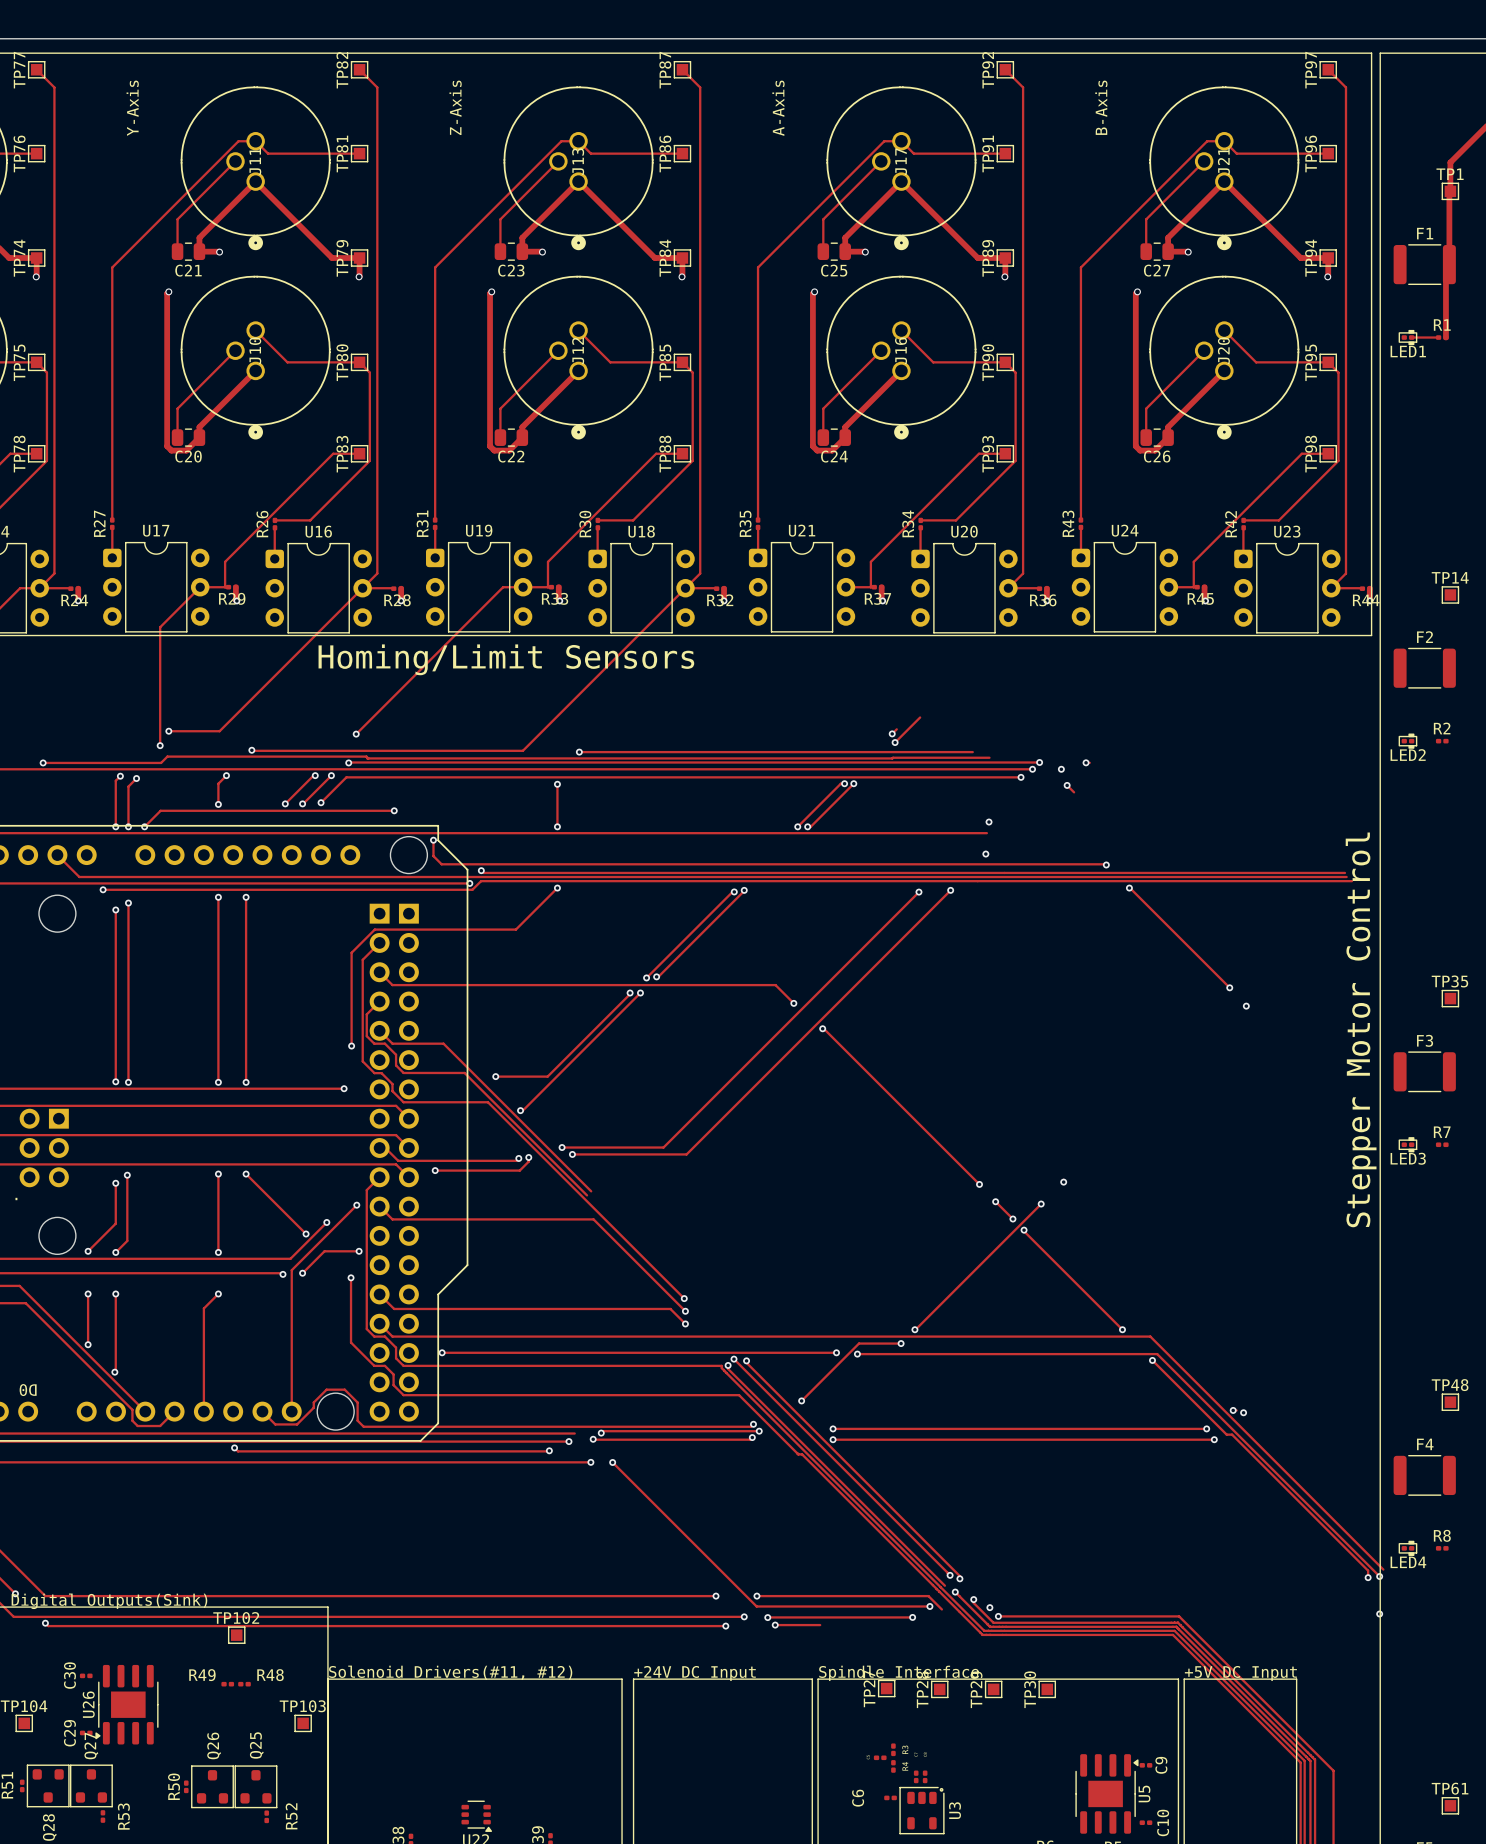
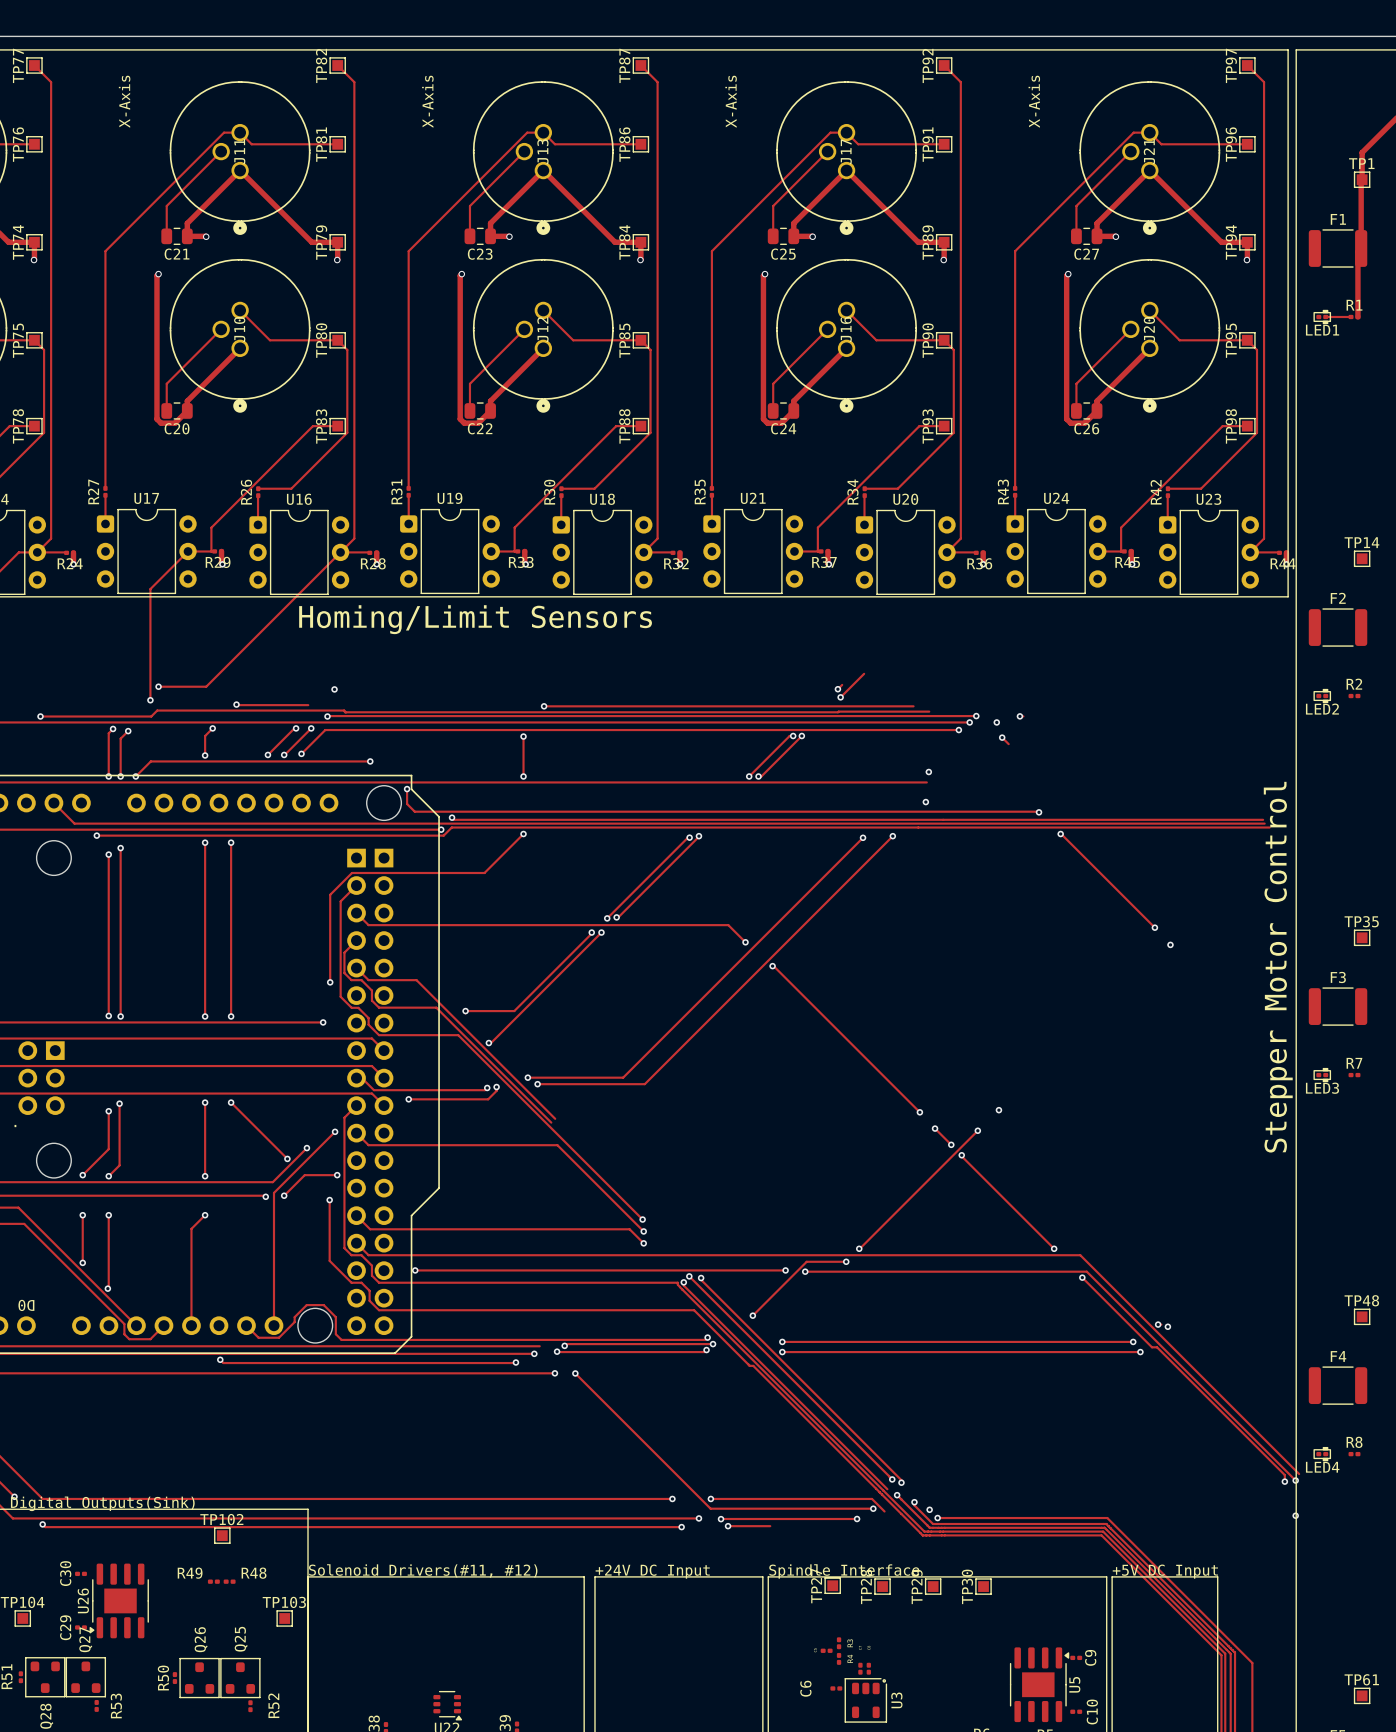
text: Z-Axis (455, 107) -> X-Axis (427, 101)
text: B-Axis (1101, 107) -> X-Axis (1034, 101)
text: Y-Axis (132, 108) -> X-Axis (124, 101)
text: A-Axis (778, 108) -> X-Axis (731, 101)
track: (523, 587) (503, 587) (356, 734) -> none
track: (685, 588) (522, 750) (328, 750) -> none

